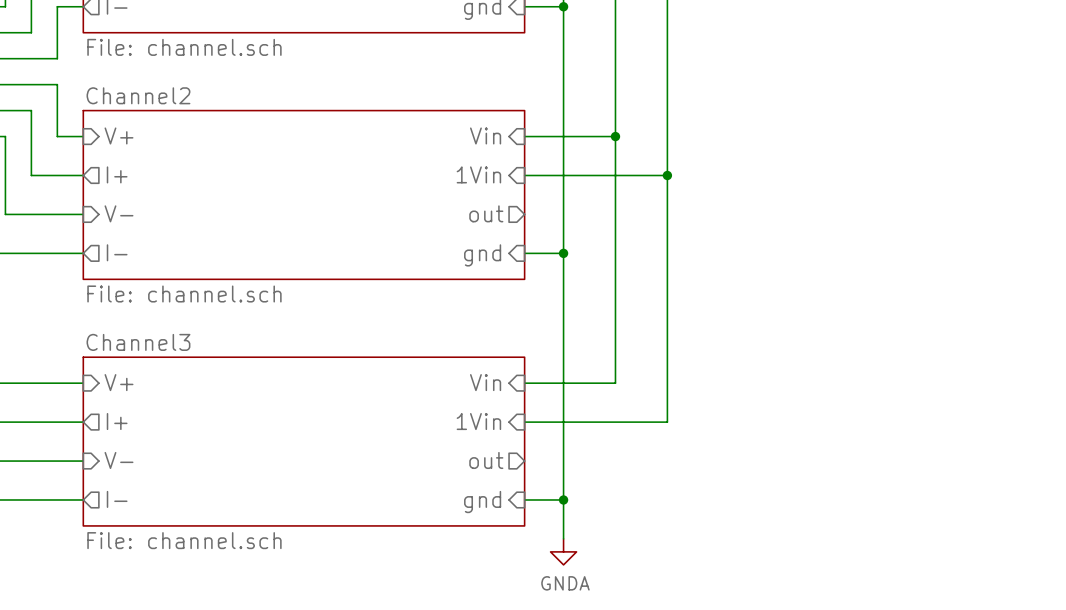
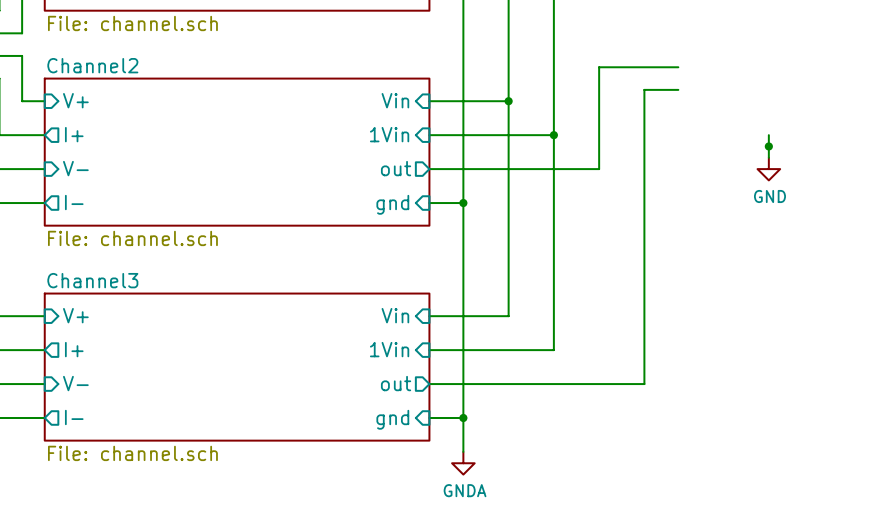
wire: none -> (678, 67) (599, 67) (599, 169) (429, 169)
wire: none -> (678, 89) (644, 89) (644, 384) (429, 384)
wire: none -> (768, 135) (768, 157)
junction: none -> (768, 146)
power symbol: none -> GND (768, 169)

